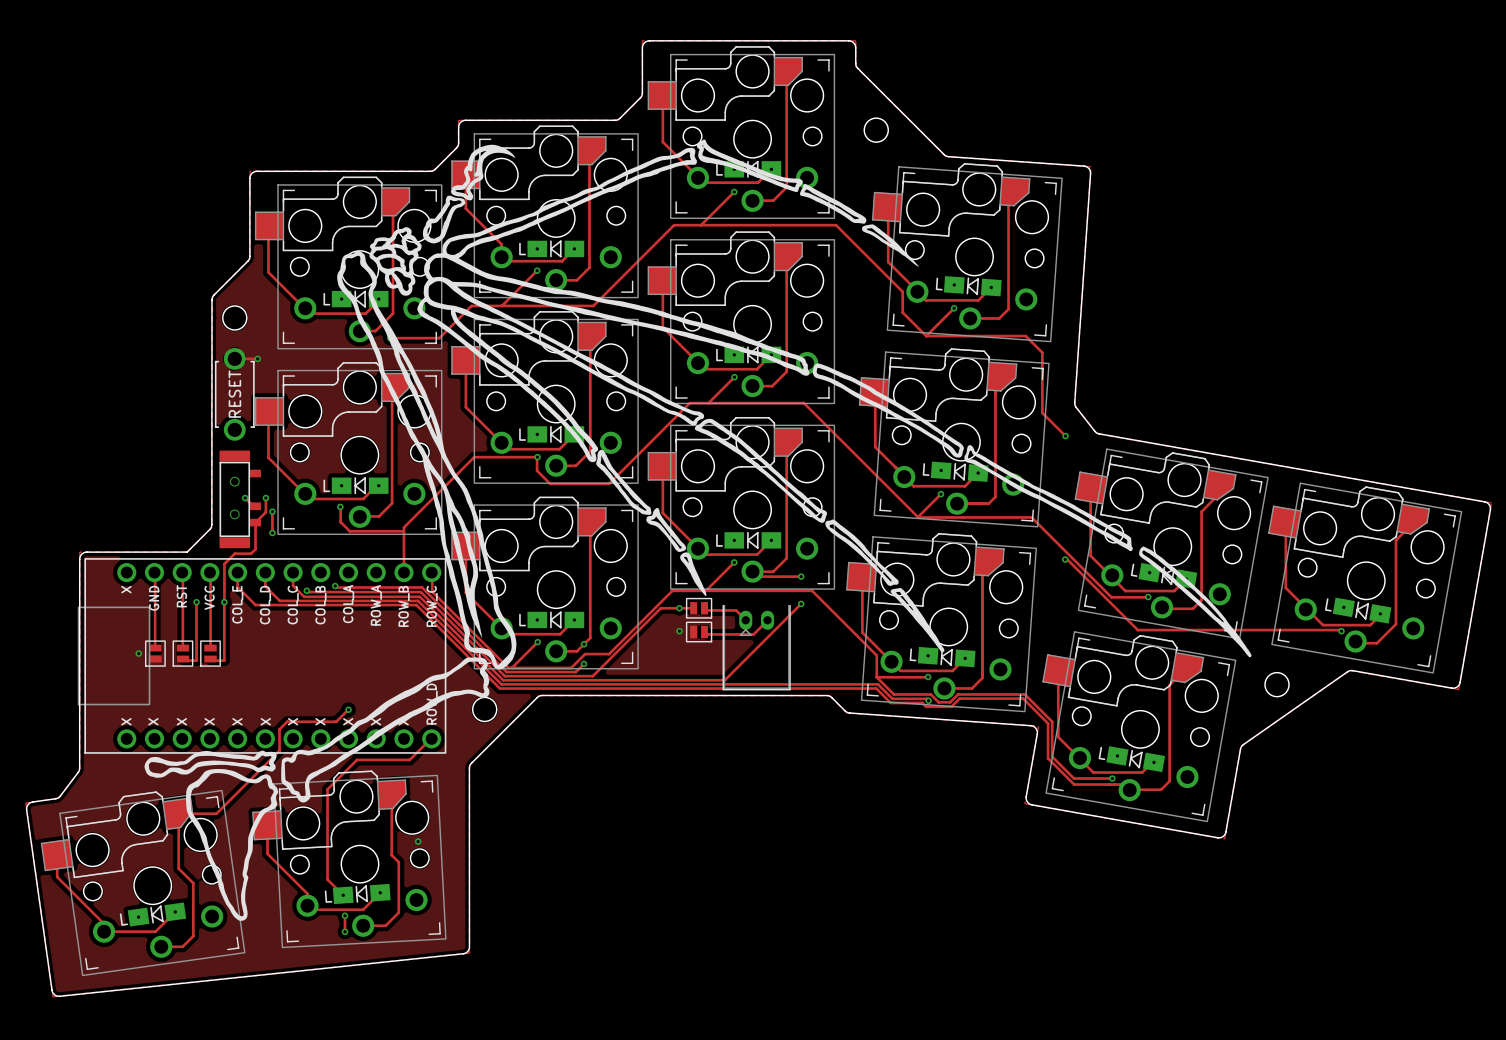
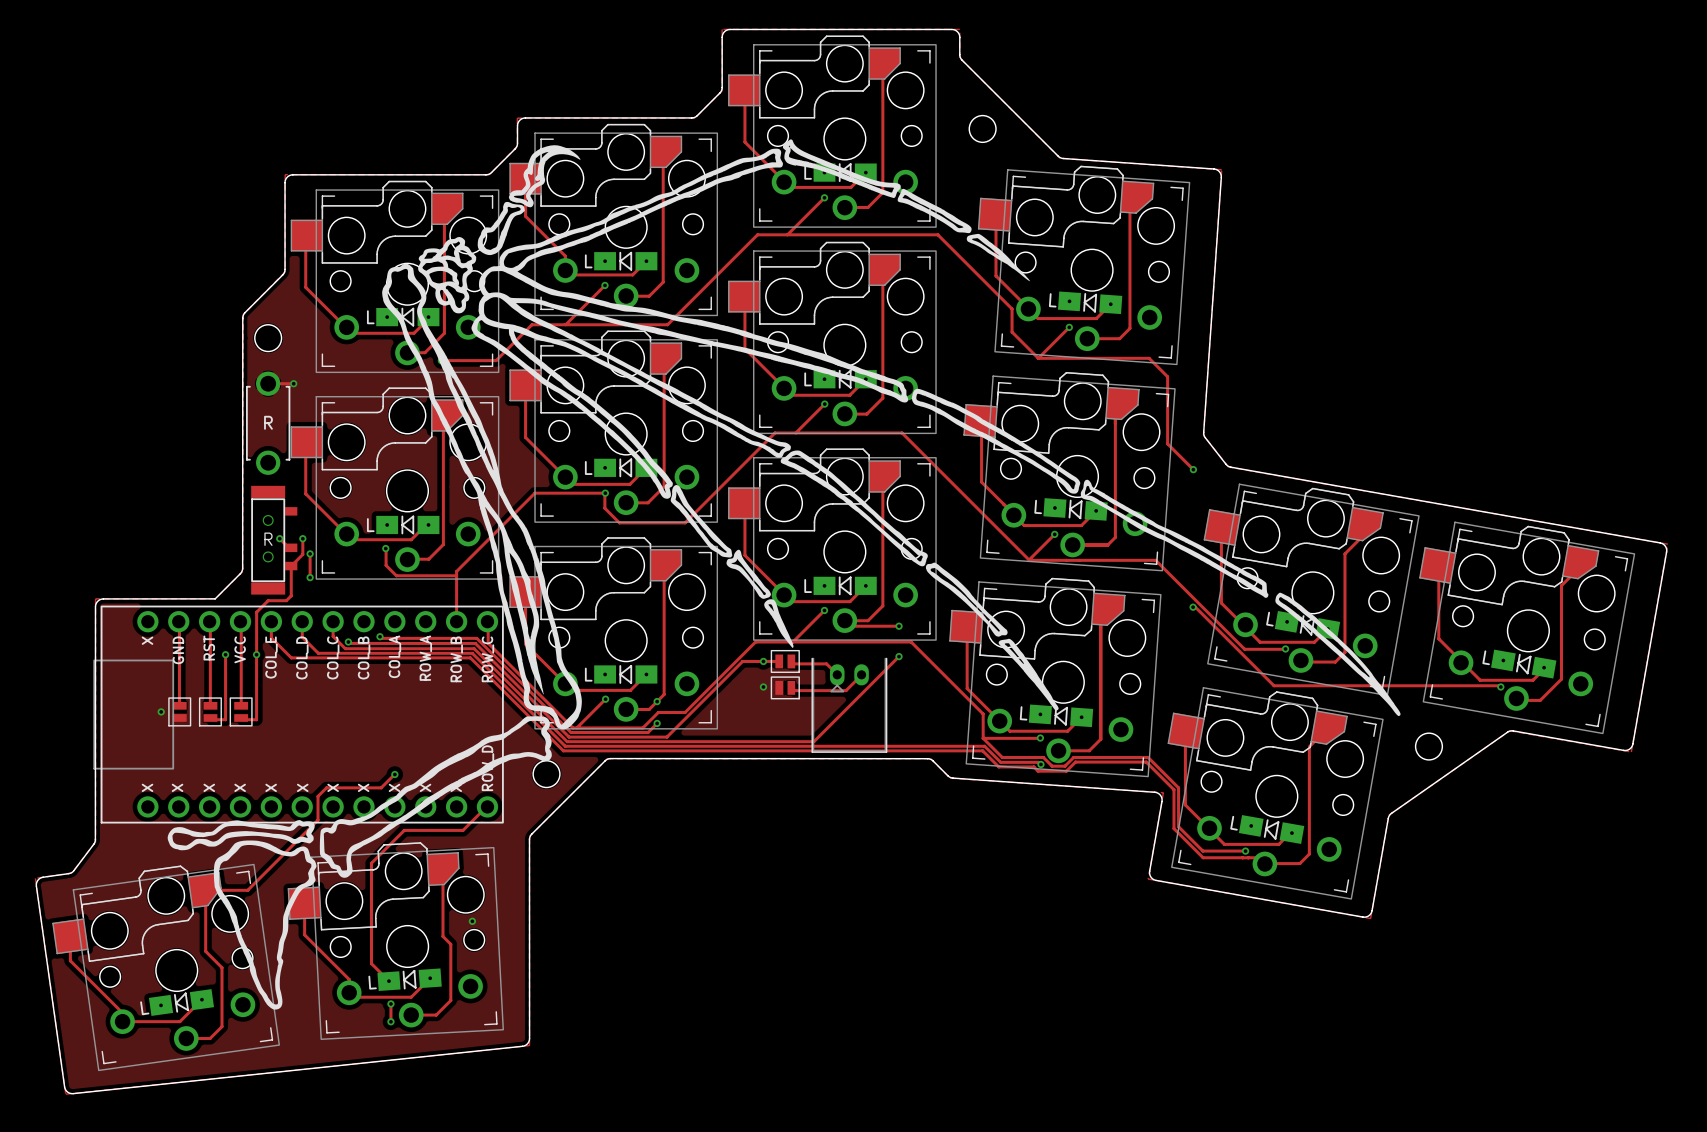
part text: none -> R (268, 422)
part text: RESET (234, 394) -> none
part text: none -> R (268, 539)

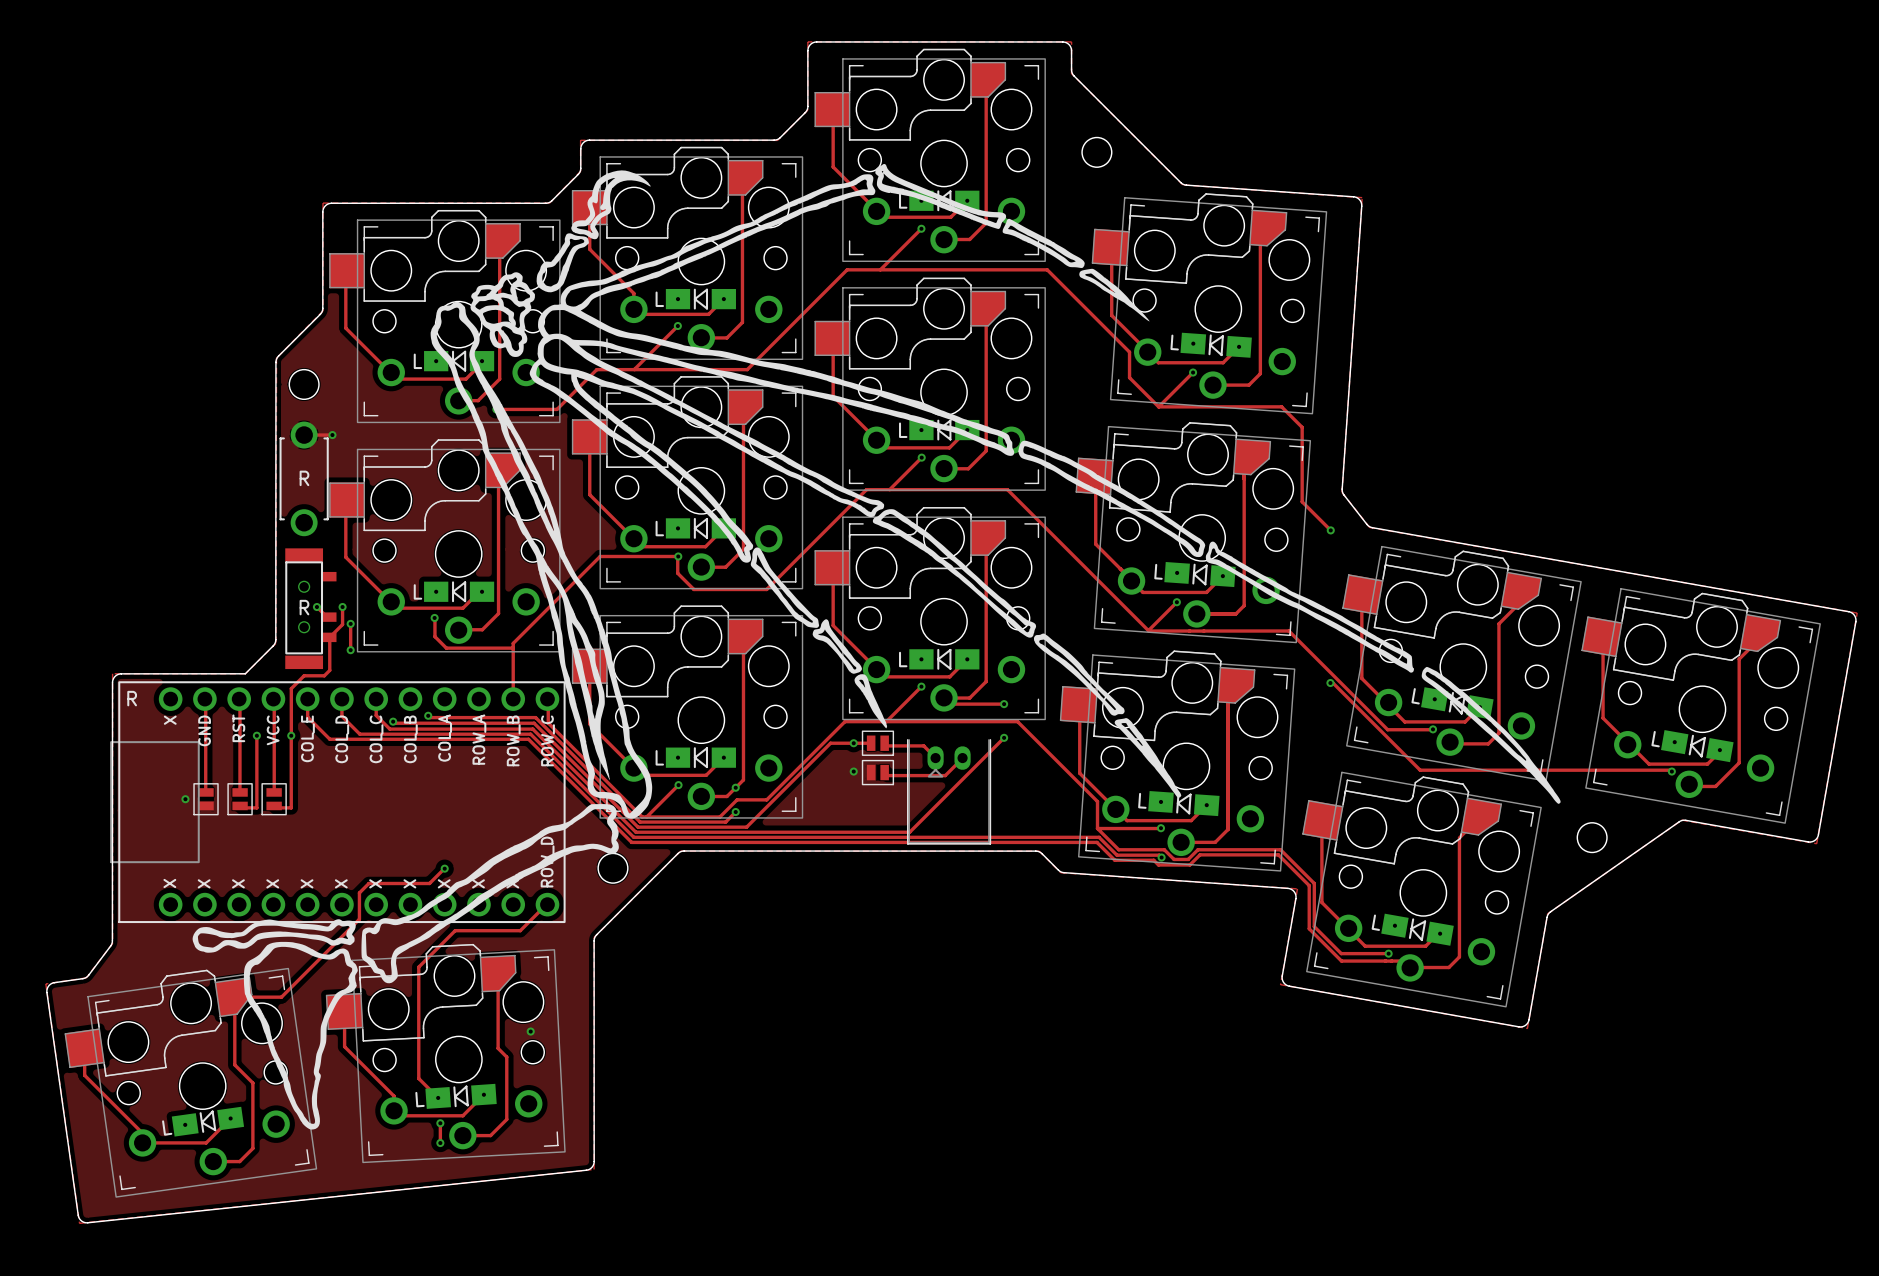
part footprint: [251, 485, 298, 595] -> [285, 548, 337, 670]
part footprint: [93, 605, 504, 824] -> [110, 681, 566, 924]

